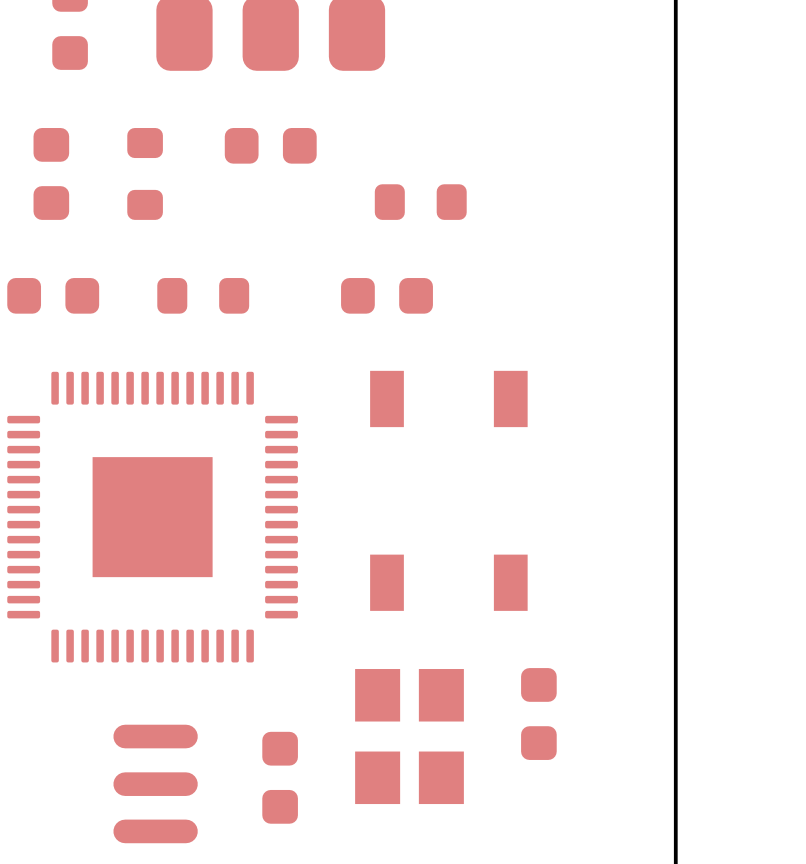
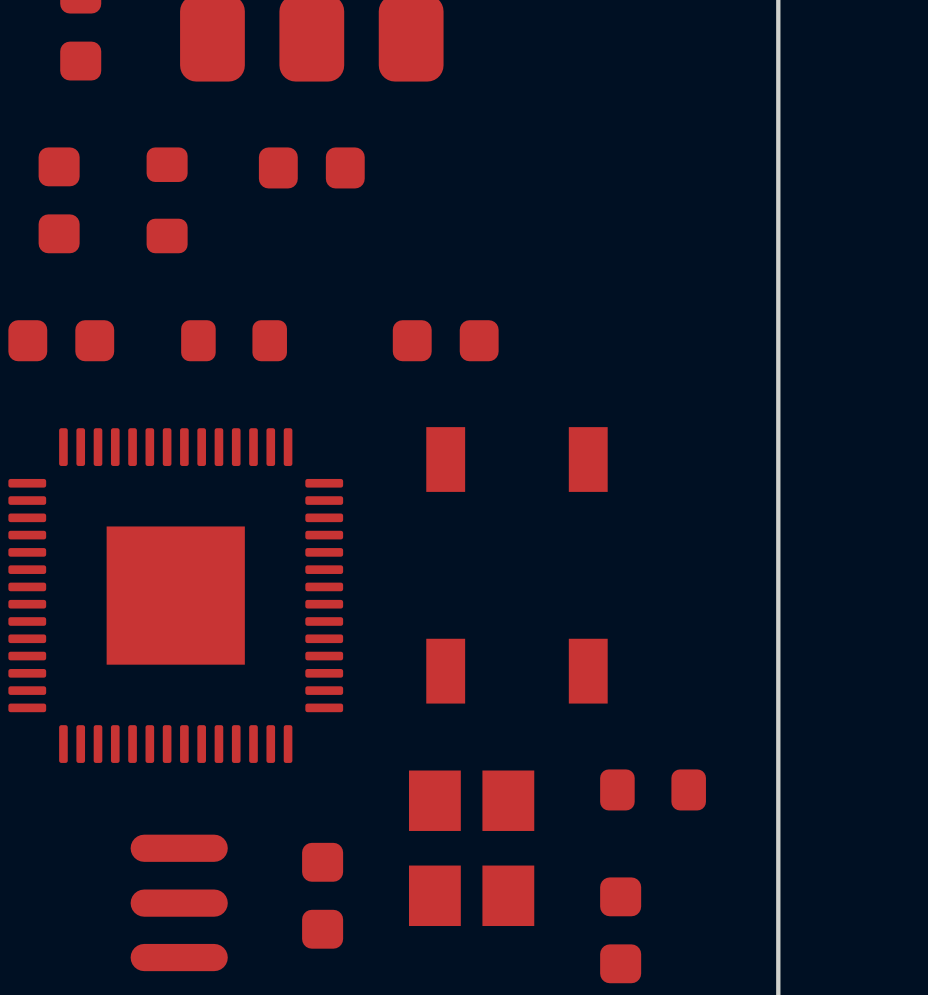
part position: (420, 202) -> (653, 789)
part position: (538, 714) -> (620, 930)

